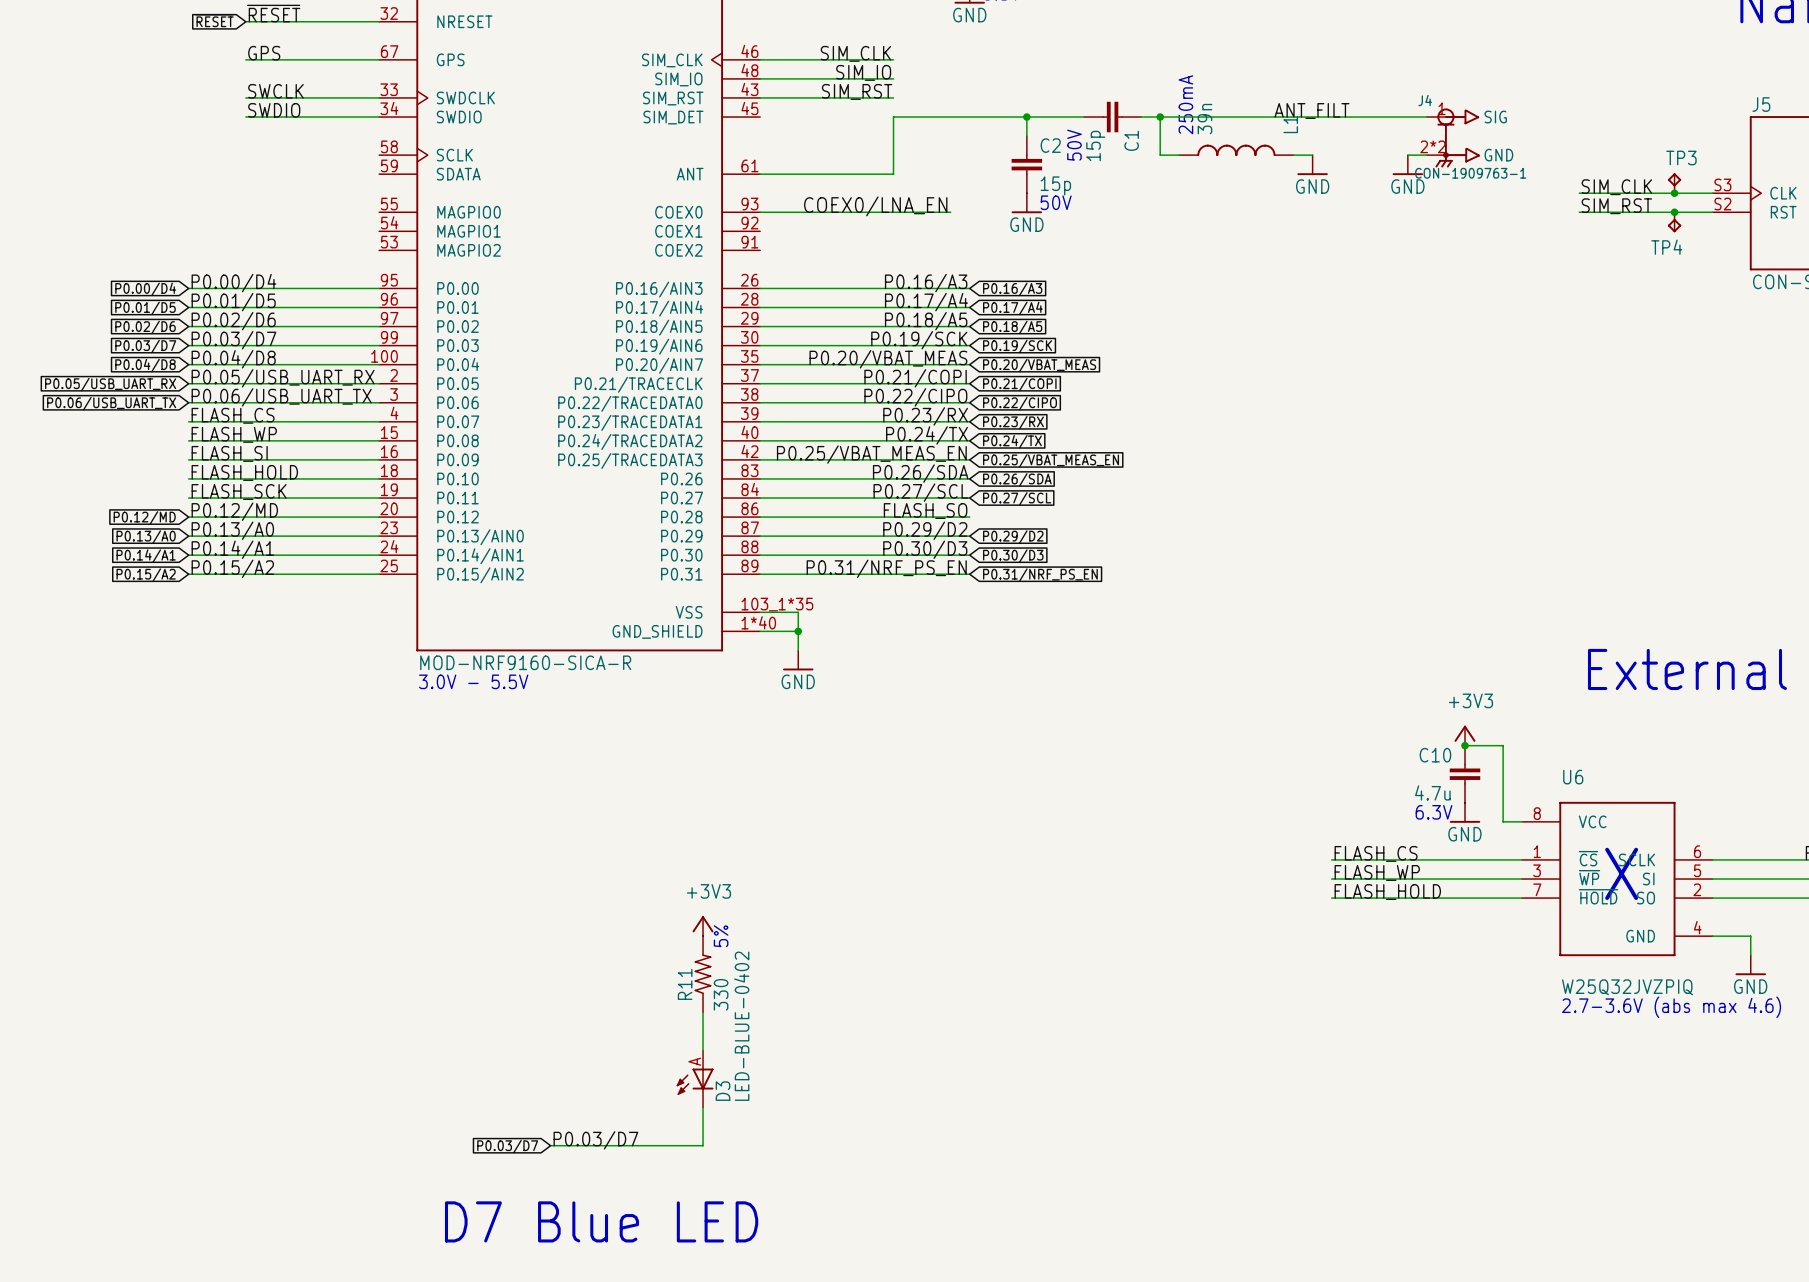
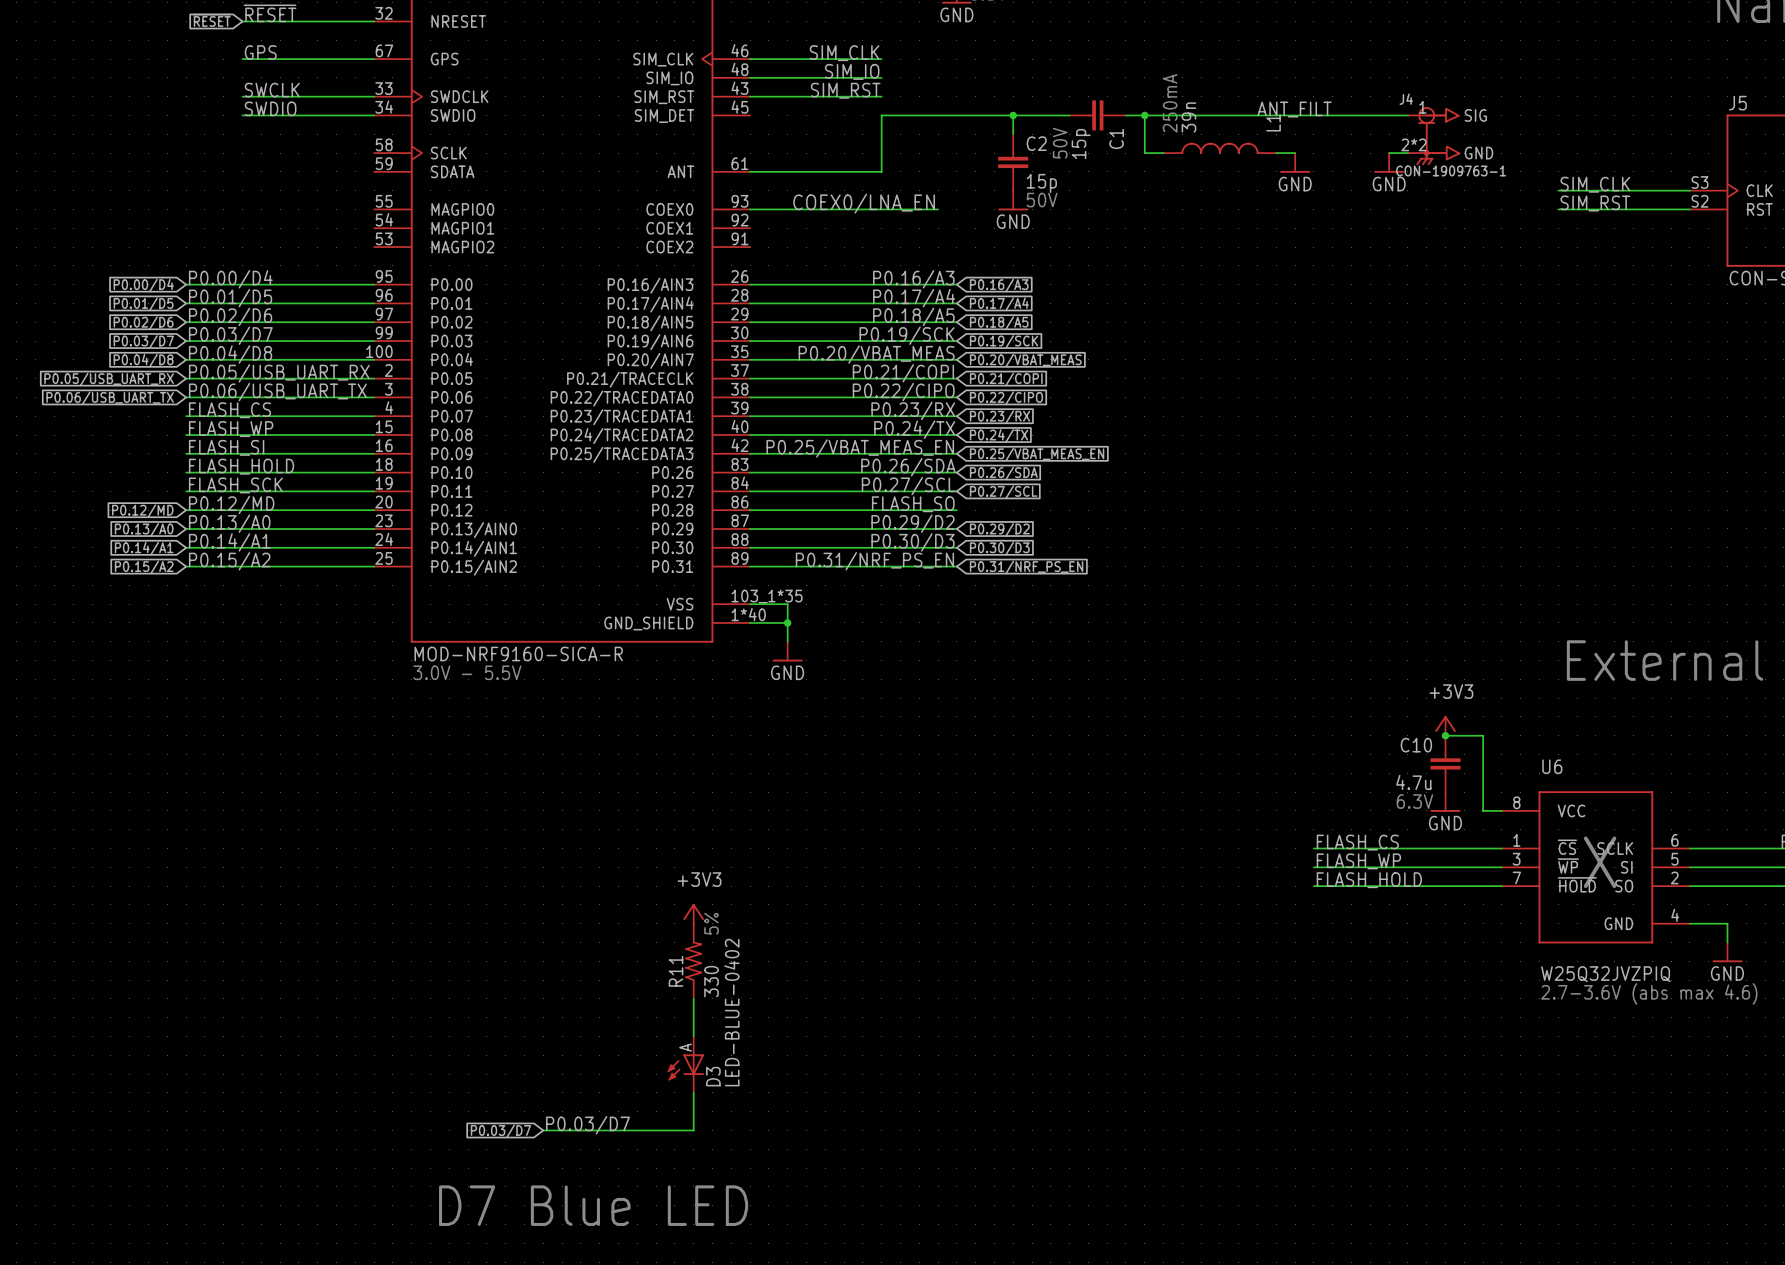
TP3: (1674, 183) -> none
junction: (1674, 193) -> none
junction: (1674, 212) -> none
TP4: (1674, 222) -> none

